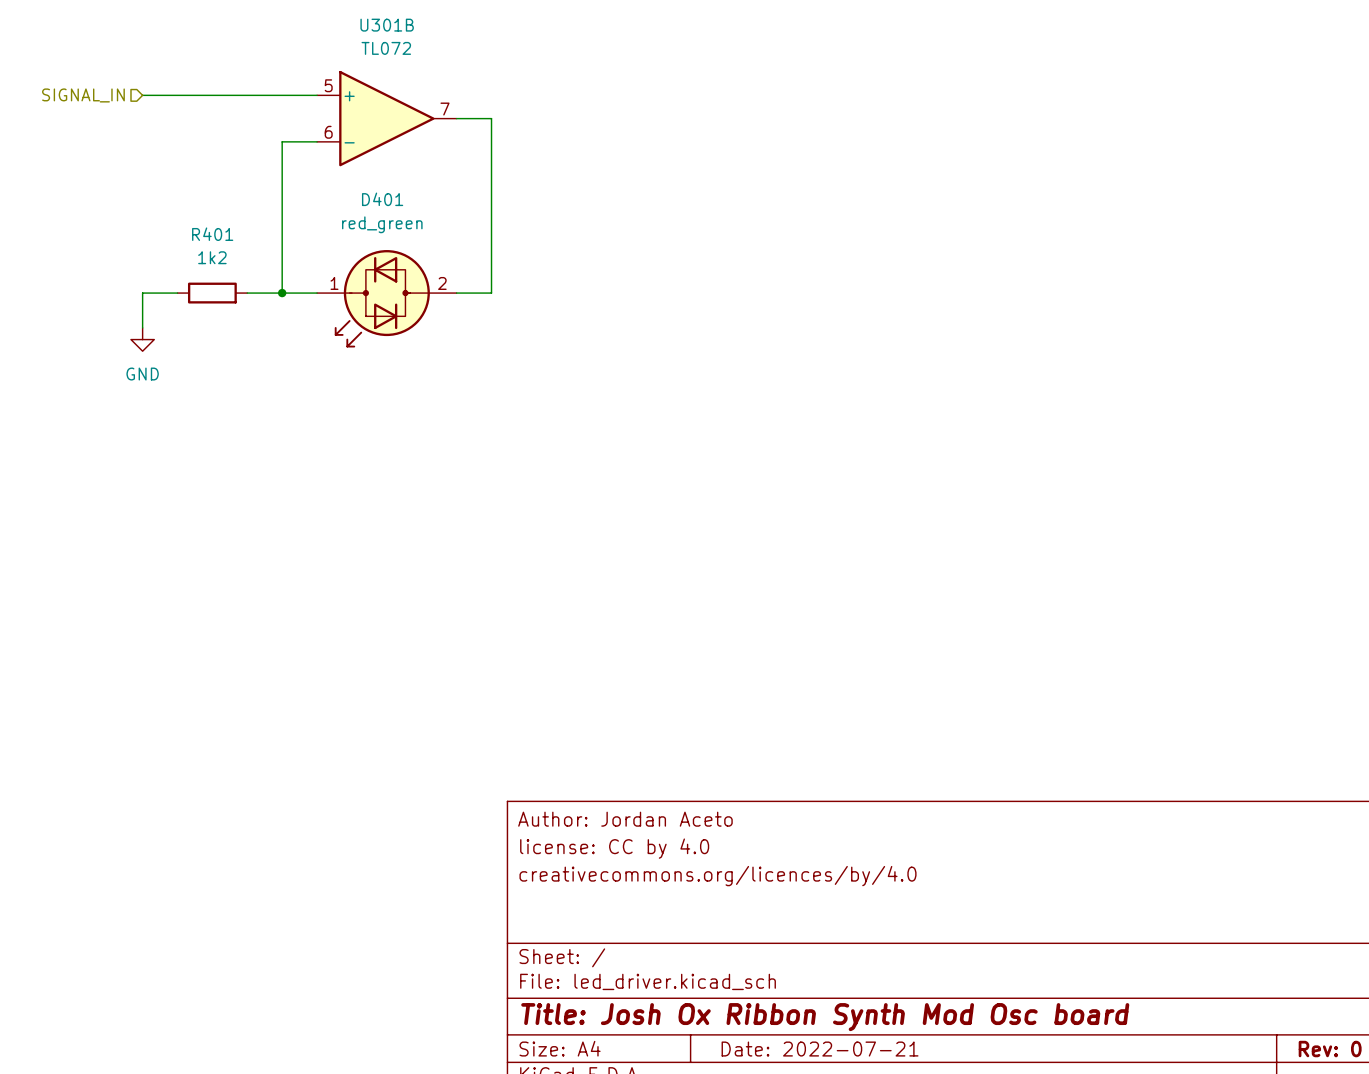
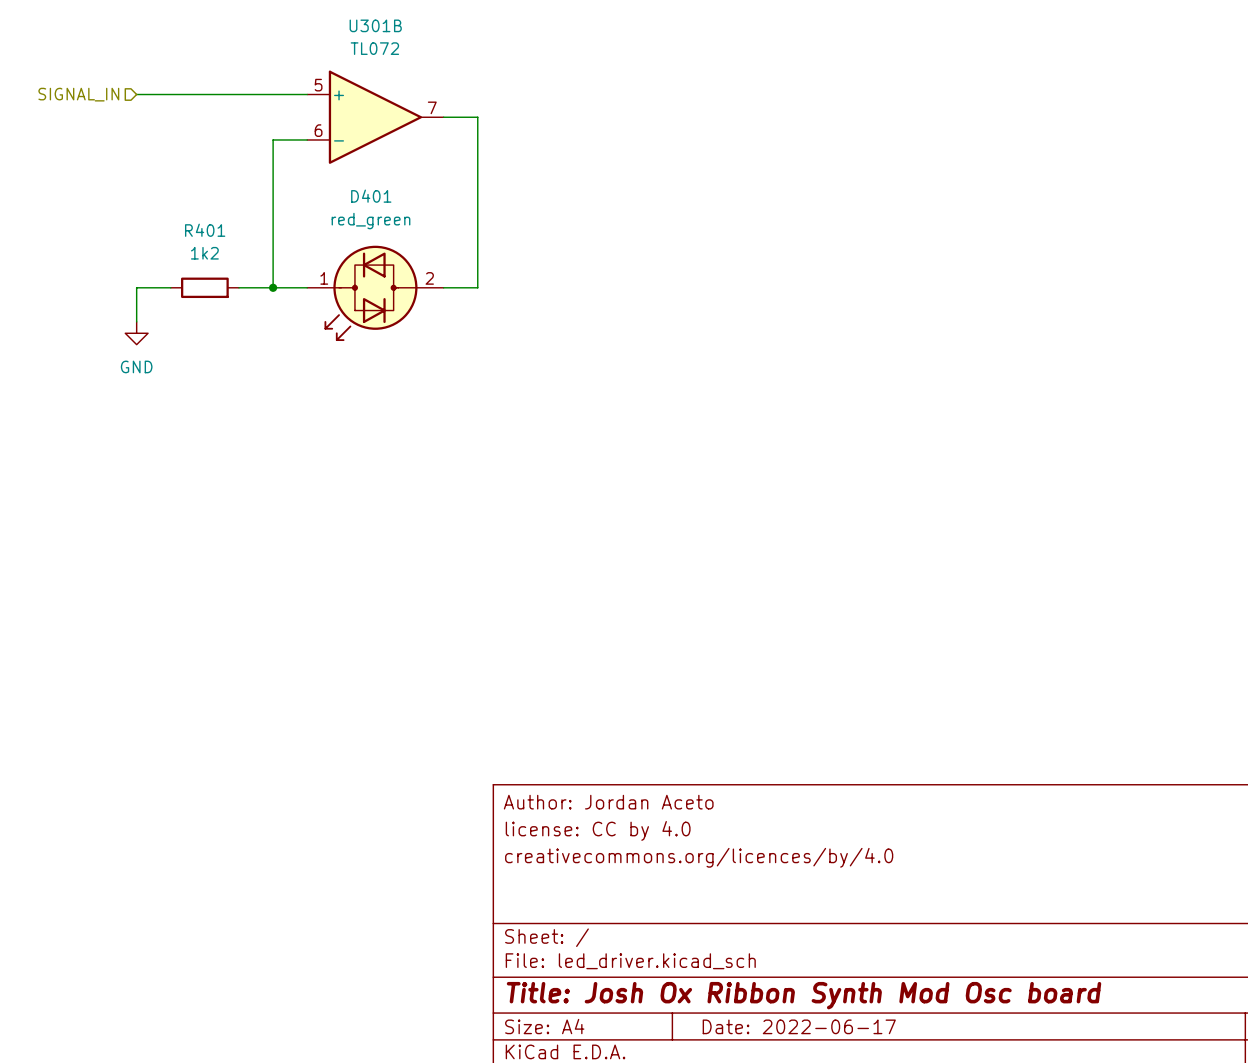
title block: Date: 2022-07-21 (820, 1049) -> Date: 2022-06-17 (799, 1026)

